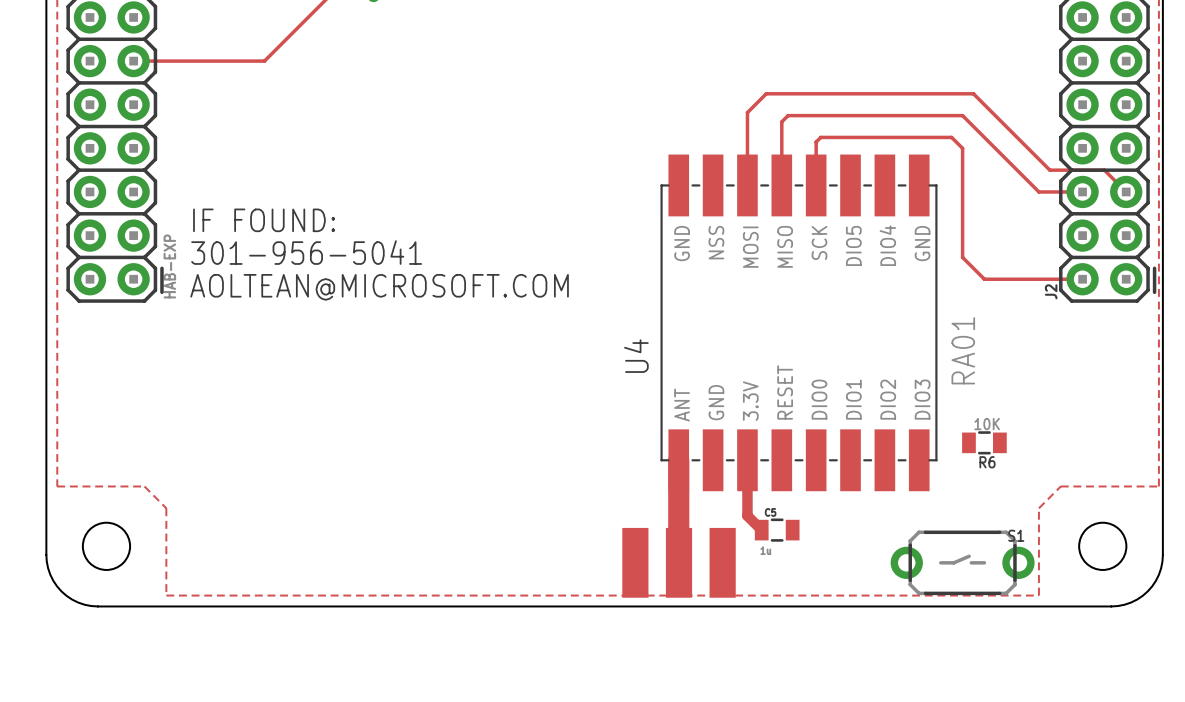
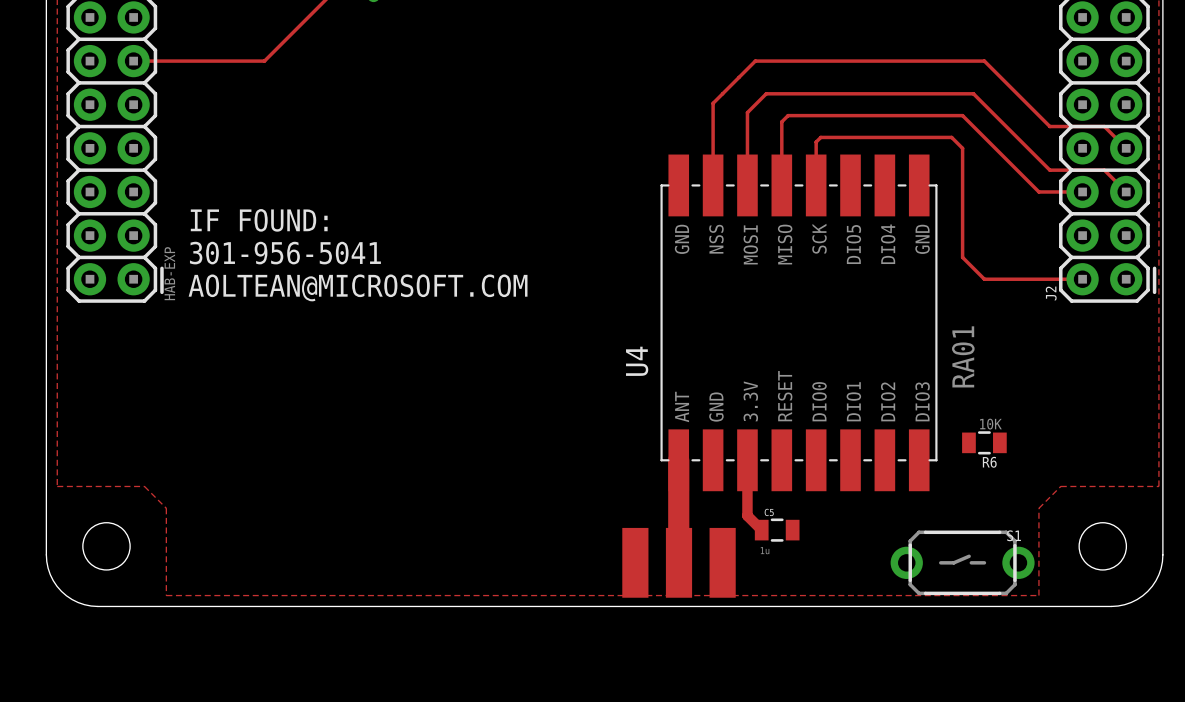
track: none -> (1126, 148) (1104, 126) (1049, 126) (984, 61) (755, 61) (713, 103) (713, 185)

